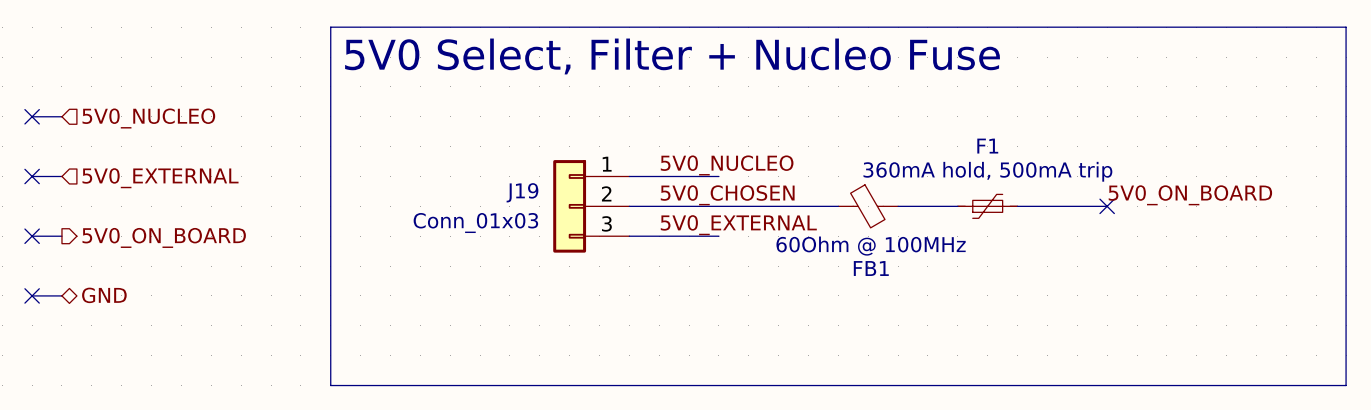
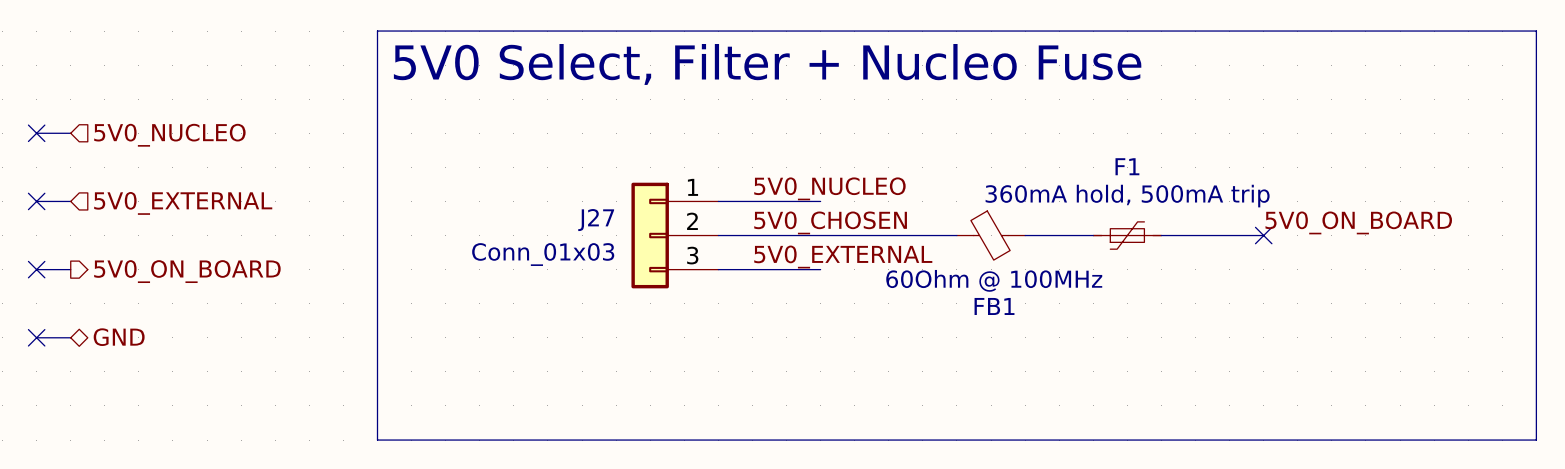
J19 name: J19 (522, 192) -> J27 (596, 220)

